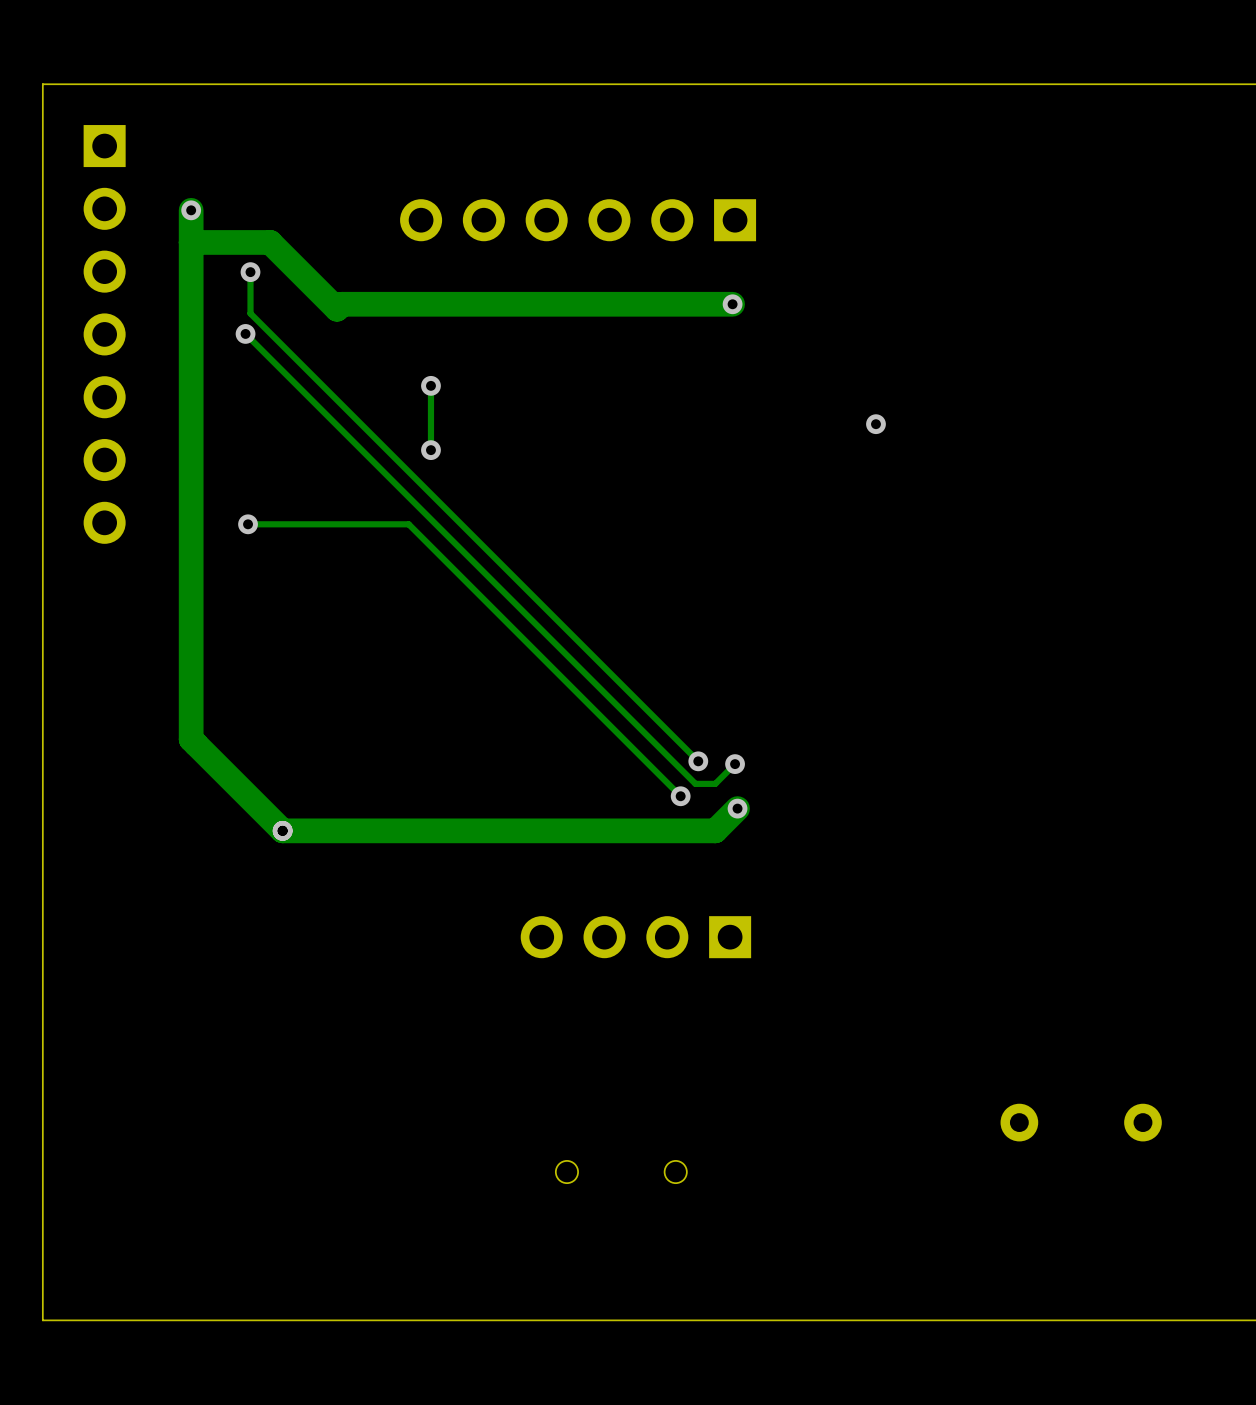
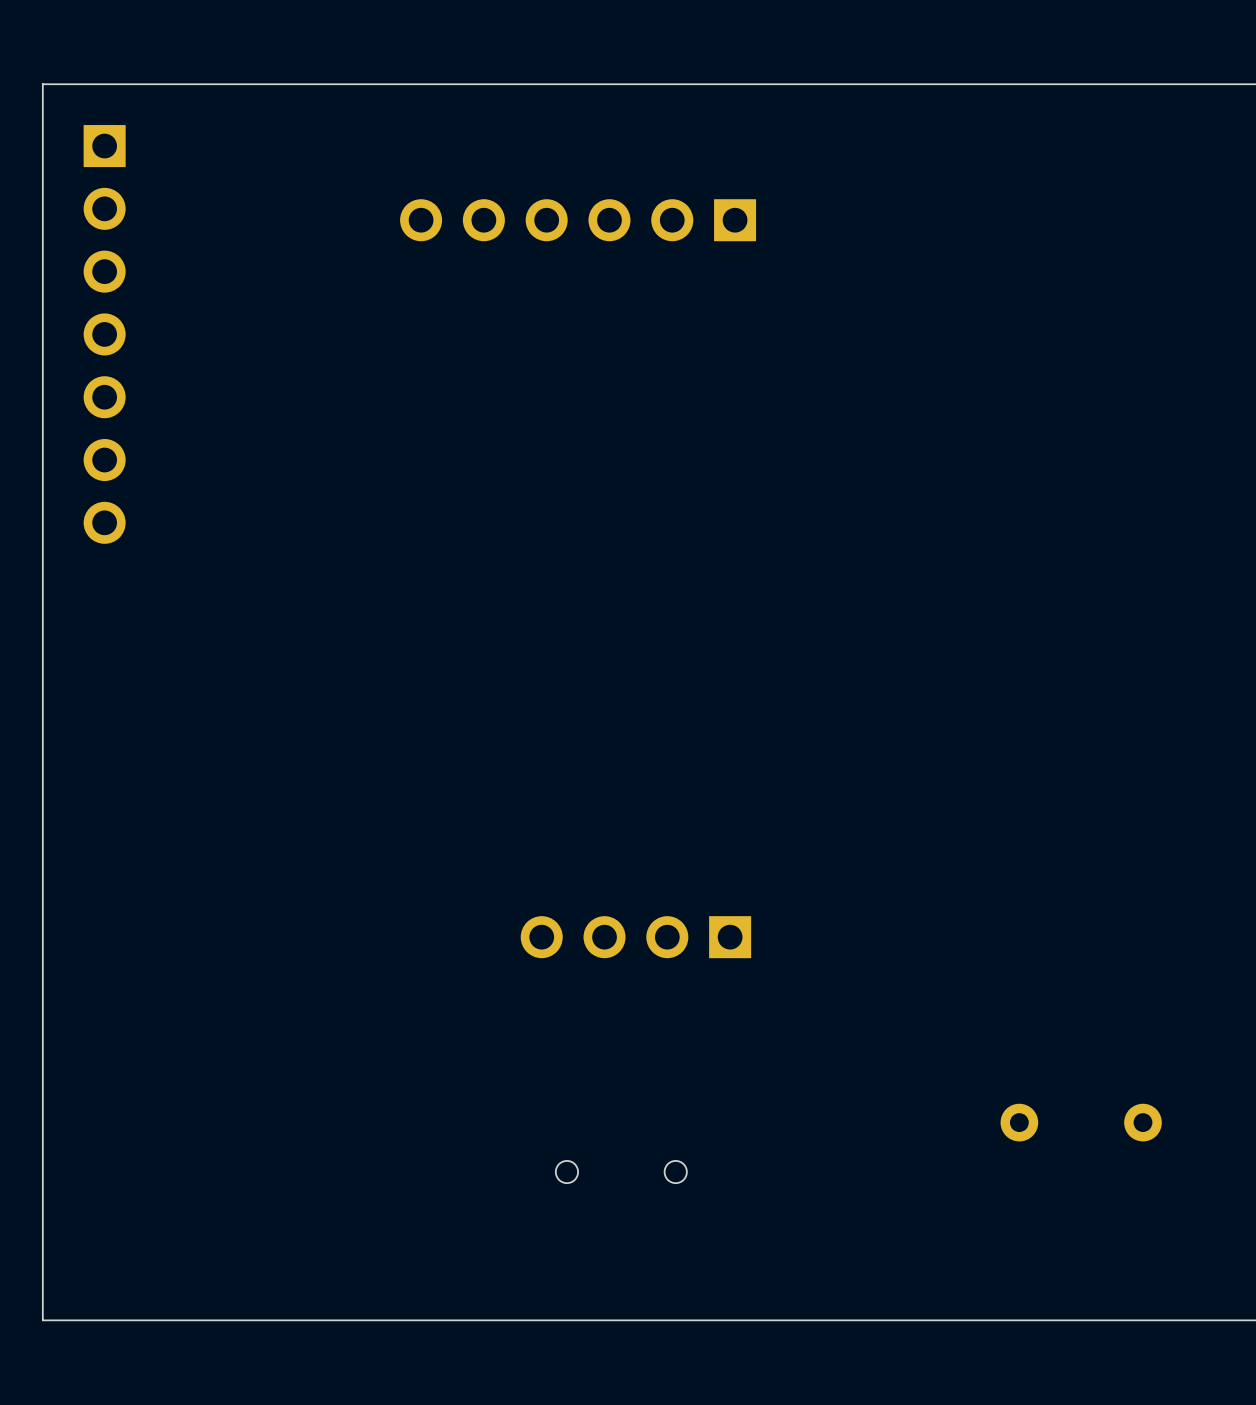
track: (191, 210) (191, 739) (282, 830) (715, 830) (737, 808) -> none
via: (191, 210) -> none
track: (191, 242) (270, 242) (337, 309) (341, 304) (732, 304) -> none
track: (250, 272) (250, 313) (698, 761) -> none
via: (250, 272) -> none
via: (732, 304) -> none
track: (245, 333) (695, 783) (715, 783) (735, 764) -> none
via: (245, 333) -> none
track: (430, 385) (430, 450) -> none
via: (430, 385) -> none
via: (875, 424) -> none
via: (430, 450) -> none
track: (248, 524) (408, 524) (680, 796) -> none
via: (248, 524) -> none
via: (698, 761) -> none
via: (735, 764) -> none
via: (680, 796) -> none
via: (737, 808) -> none
via: (282, 830) -> none

